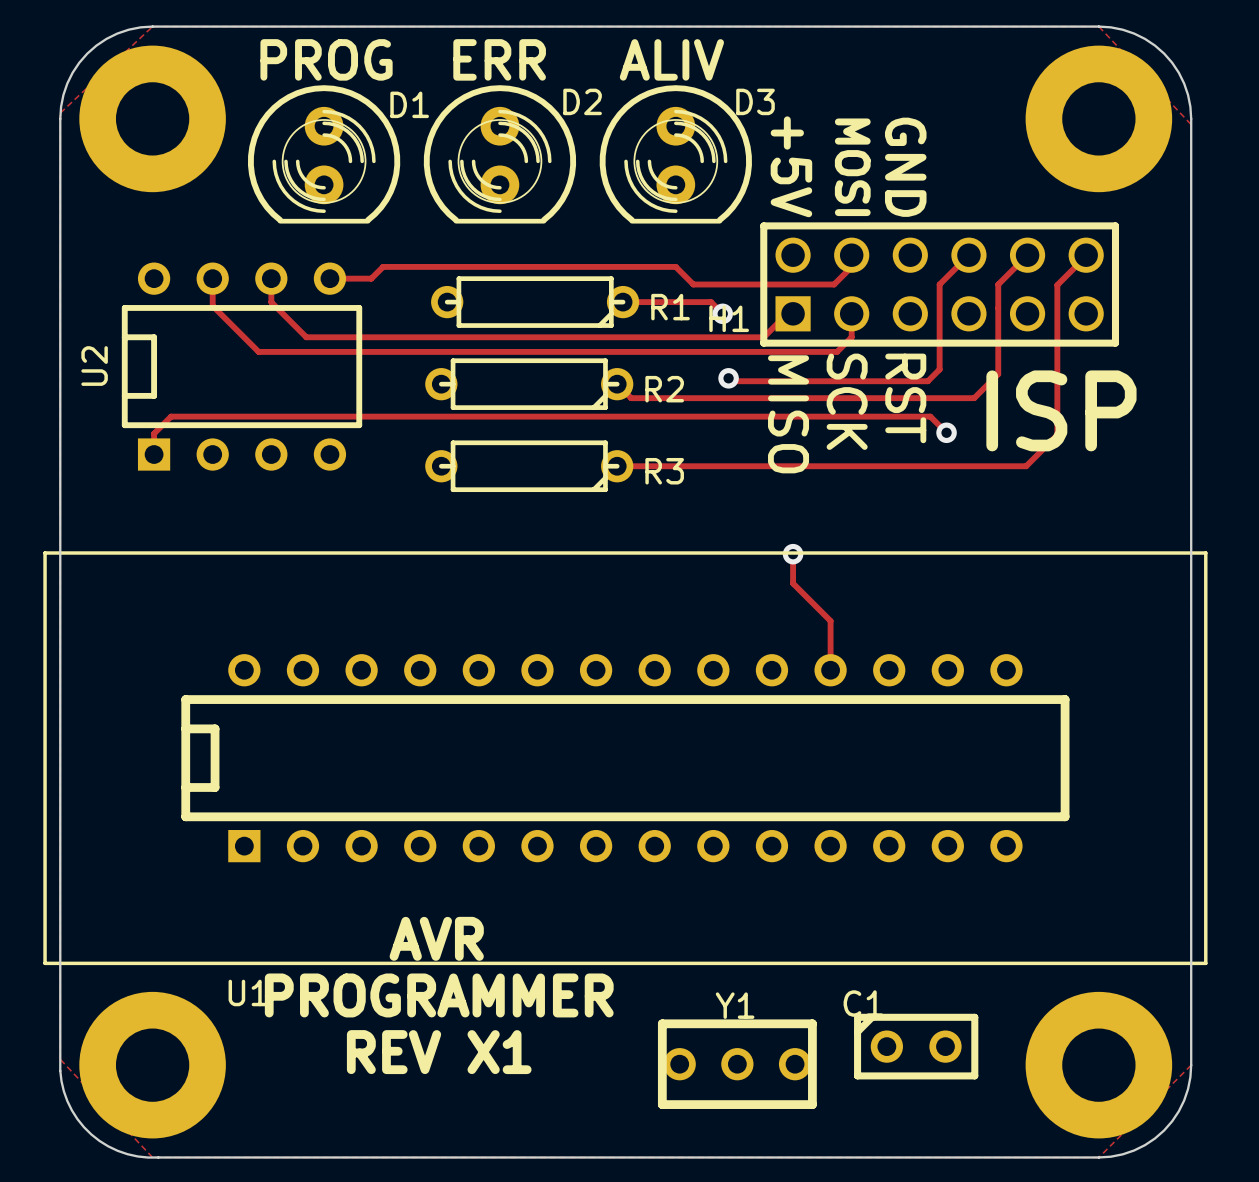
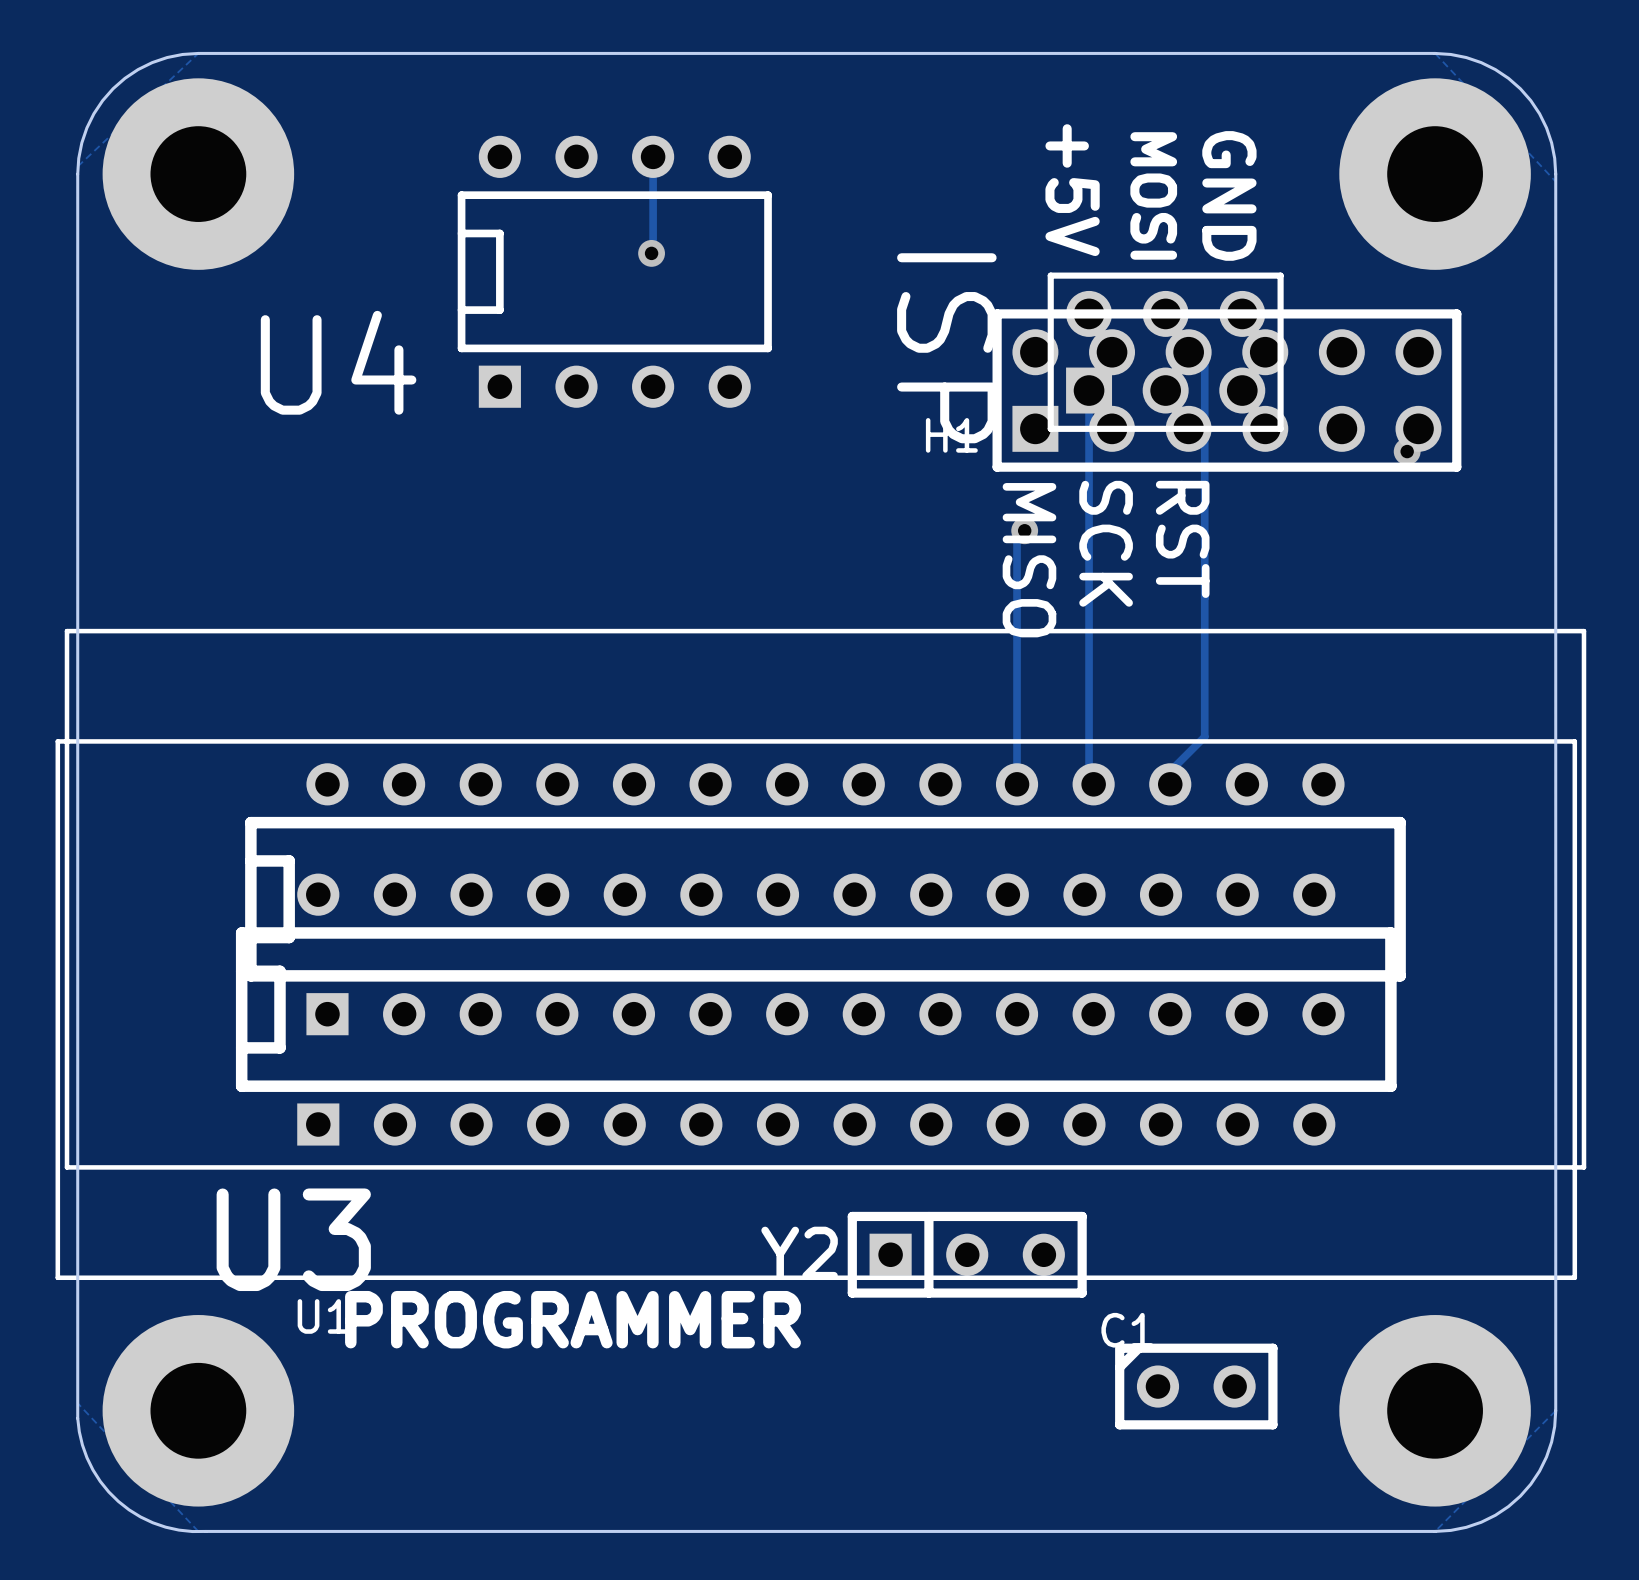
text: PROG (326, 59) -> none
text: ERR (499, 59) -> none
text: ALIV (671, 59) -> none
track: none -> (653, 156) (653, 251) (651, 253)
D1: (324, 154) -> none
D2: (499, 154) -> none
D3: (675, 154) -> none
text position: +5V (791, 166) -> +5V (1072, 190)
text position: MOSI (852, 167) -> MOSI (1153, 195)
text position: GND (905, 167) -> GND (1229, 195)
via: none -> (651, 253)
U4: none -> (614, 271)
track: none -> (1165, 313) (1165, 323) (1204, 362) (1204, 736) (1170, 771) (1170, 784)
track: (851, 255) (851, 266) (834, 284) (693, 284) (675, 266) (383, 266) (371, 278) (329, 278) -> none
part: none -> (1165, 352)
track: (968, 255) (939, 284) (939, 369) (927, 381) (731, 381) (728, 378) -> none
track: (1027, 255) (998, 284) (998, 374) (974, 398) (631, 398) (617, 384) -> none
track: (1086, 255) (1057, 285) (1057, 435) (1026, 466) (617, 466) -> none
track: (212, 278) (212, 305) (258, 351) (837, 351) (851, 337) (851, 313) -> none
track: (271, 278) (271, 302) (306, 337) (763, 337) (787, 313) (793, 313) -> none
track: none -> (1089, 390) (1089, 779) (1093, 784)
R1: (535, 302) -> none
track: (623, 302) (711, 302) (722, 313) -> none
via: (722, 313) -> none
via: none -> (1407, 451)
U2: (242, 366) -> none
via: (728, 378) -> none
R2: (529, 384) -> none
track: none -> (1024, 530) (1017, 538) (1017, 784)
via: none -> (1024, 530)
text rotation: 0° (1061, 410) -> 90° clockwise (946, 348)
text position: ISP (1061, 410) -> ISP (946, 348)
track: (946, 432) (930, 416) (171, 416) (154, 433) (154, 454) -> none
via: (946, 432) -> none
R3: (529, 466) -> none
track: (793, 554) (793, 583) (830, 621) (830, 670) -> none
via: (793, 554) -> none
U3: none -> (825, 899)
text: AVR (436, 938) -> none
Y2: none -> (967, 1254)
text: REV X1 (439, 1052) -> none
Y1: (737, 1064) -> none

